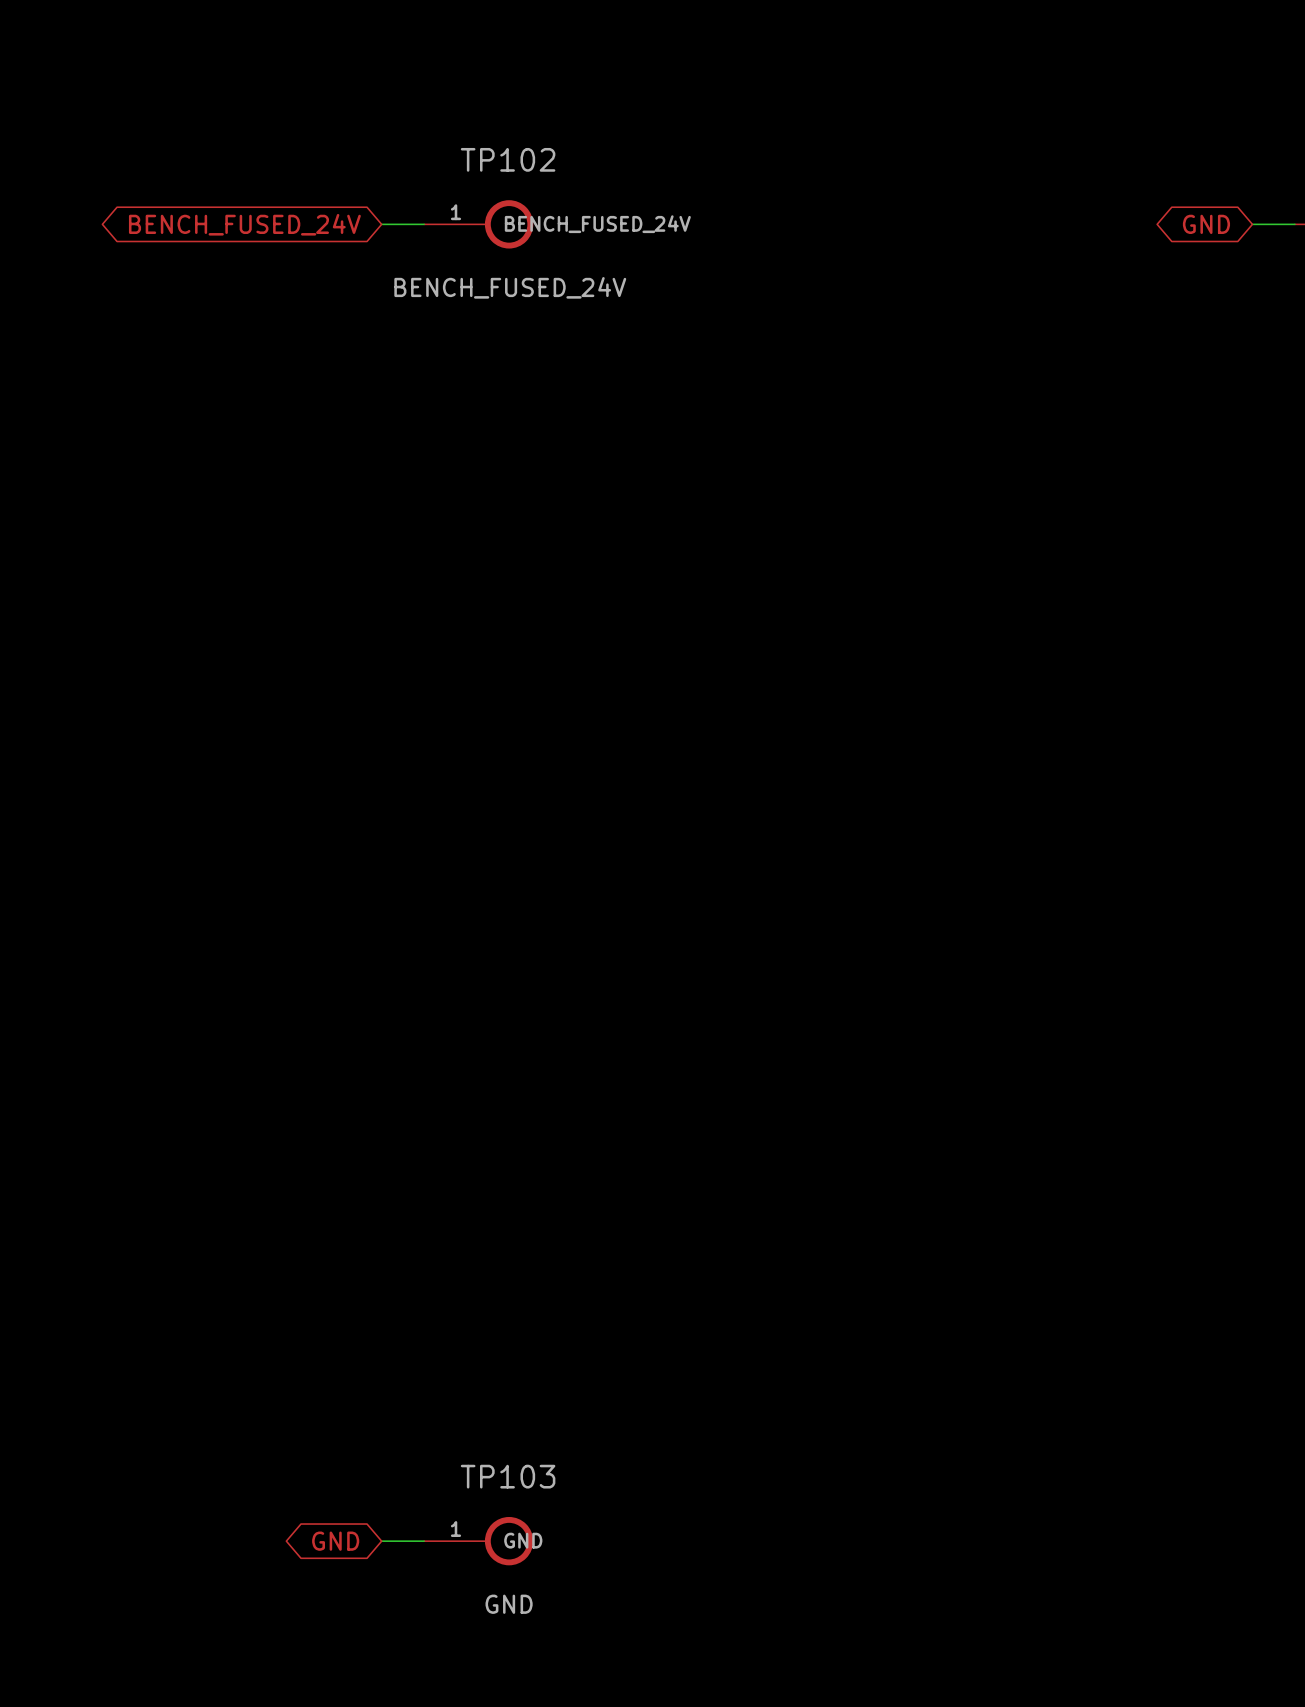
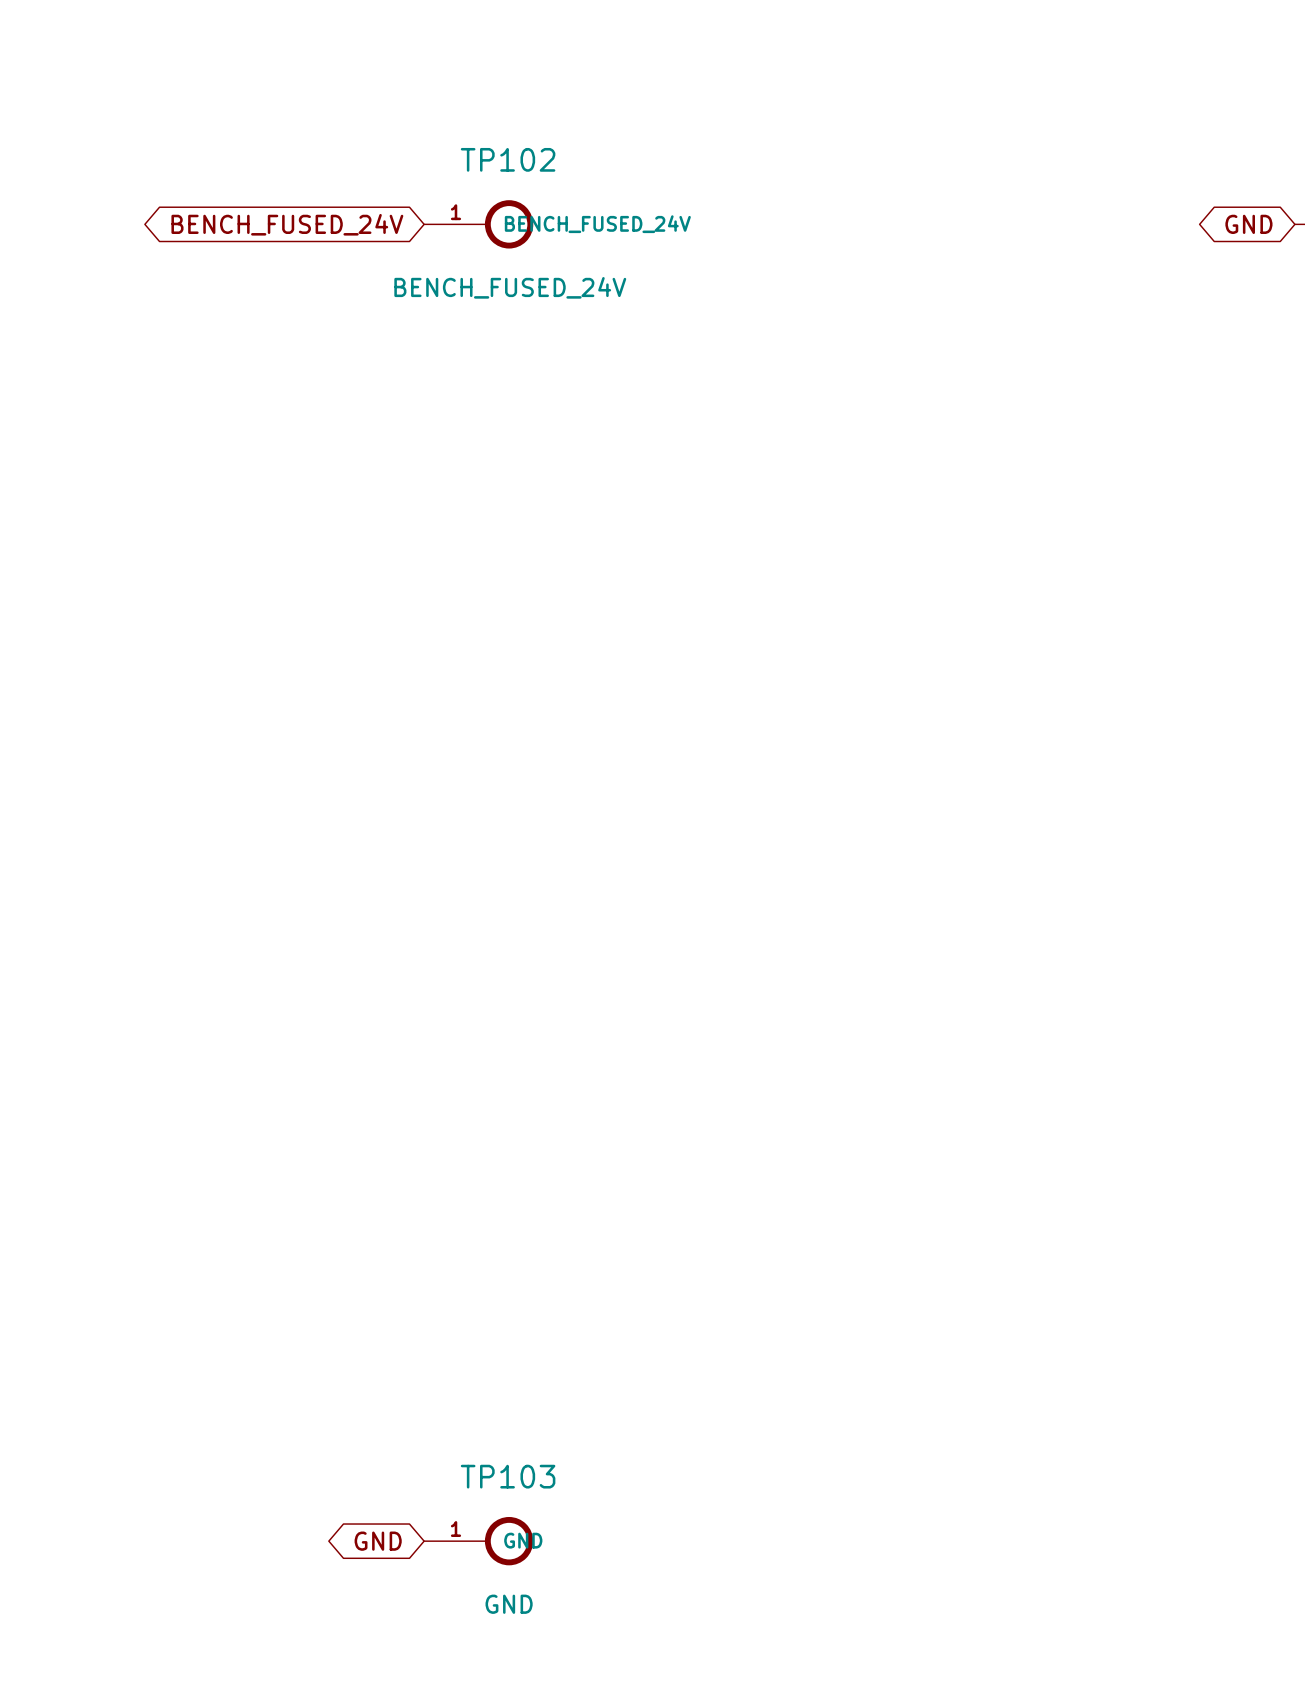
global label position: BENCH_FUSED_24V (244, 224) -> BENCH_FUSED_24V (287, 224)
wire: (381, 224) (424, 224) -> none
global label position: GND (1206, 224) -> GND (1248, 224)
wire: (1252, 224) (1294, 224) -> none
global label position: GND (335, 1541) -> GND (378, 1541)
wire: (381, 1541) (424, 1541) -> none

